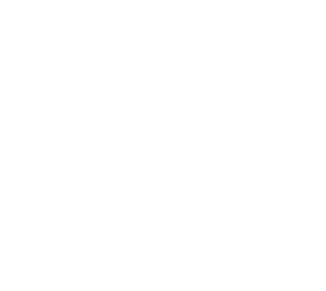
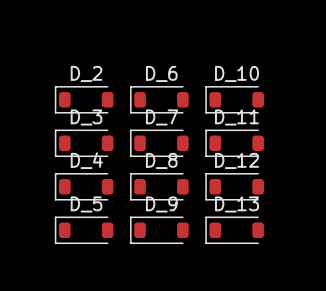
D_2: none -> (84, 99)
D_6: none -> (159, 99)
D_10: none -> (234, 99)
D_3: none -> (84, 143)
D_7: none -> (159, 143)
D_11: none -> (234, 143)
D_4: none -> (84, 186)
D_8: none -> (159, 186)
D_12: none -> (234, 186)
D_5: none -> (84, 230)
D_9: none -> (159, 230)
D_13: none -> (234, 230)

